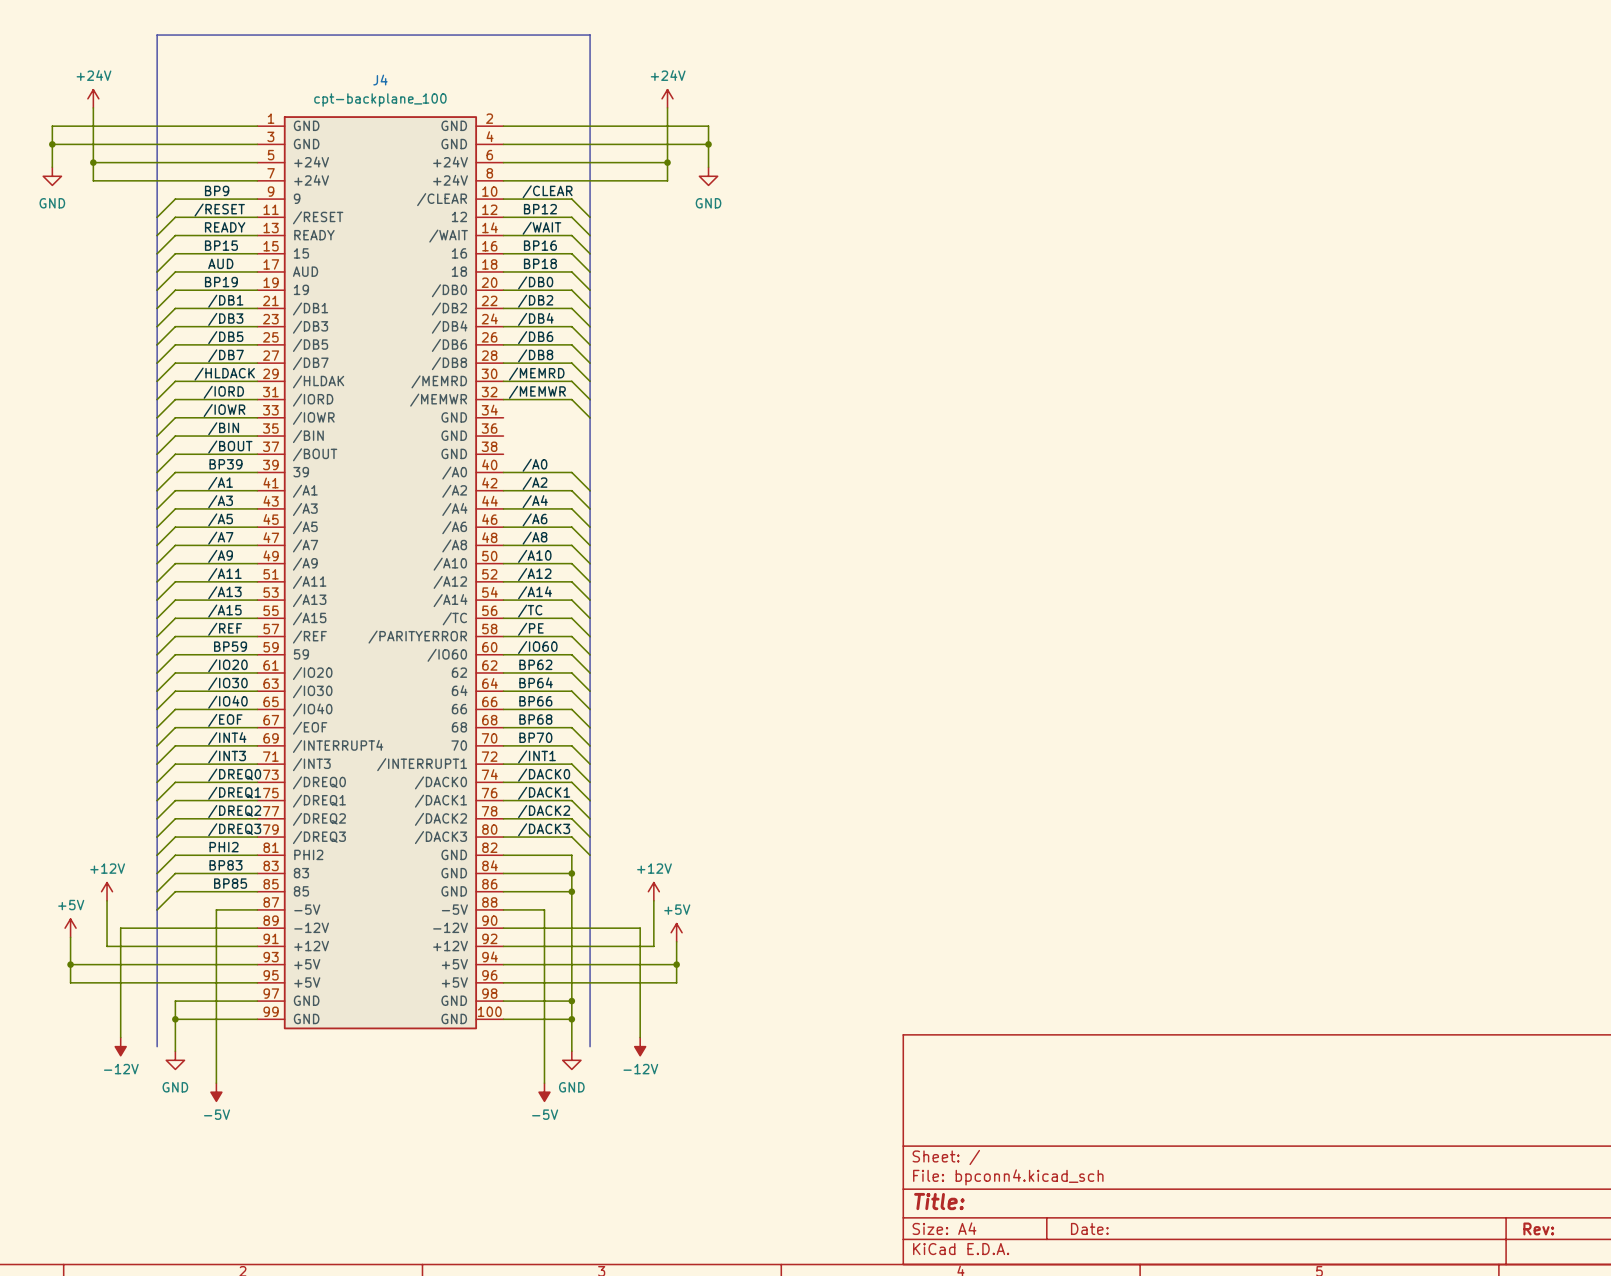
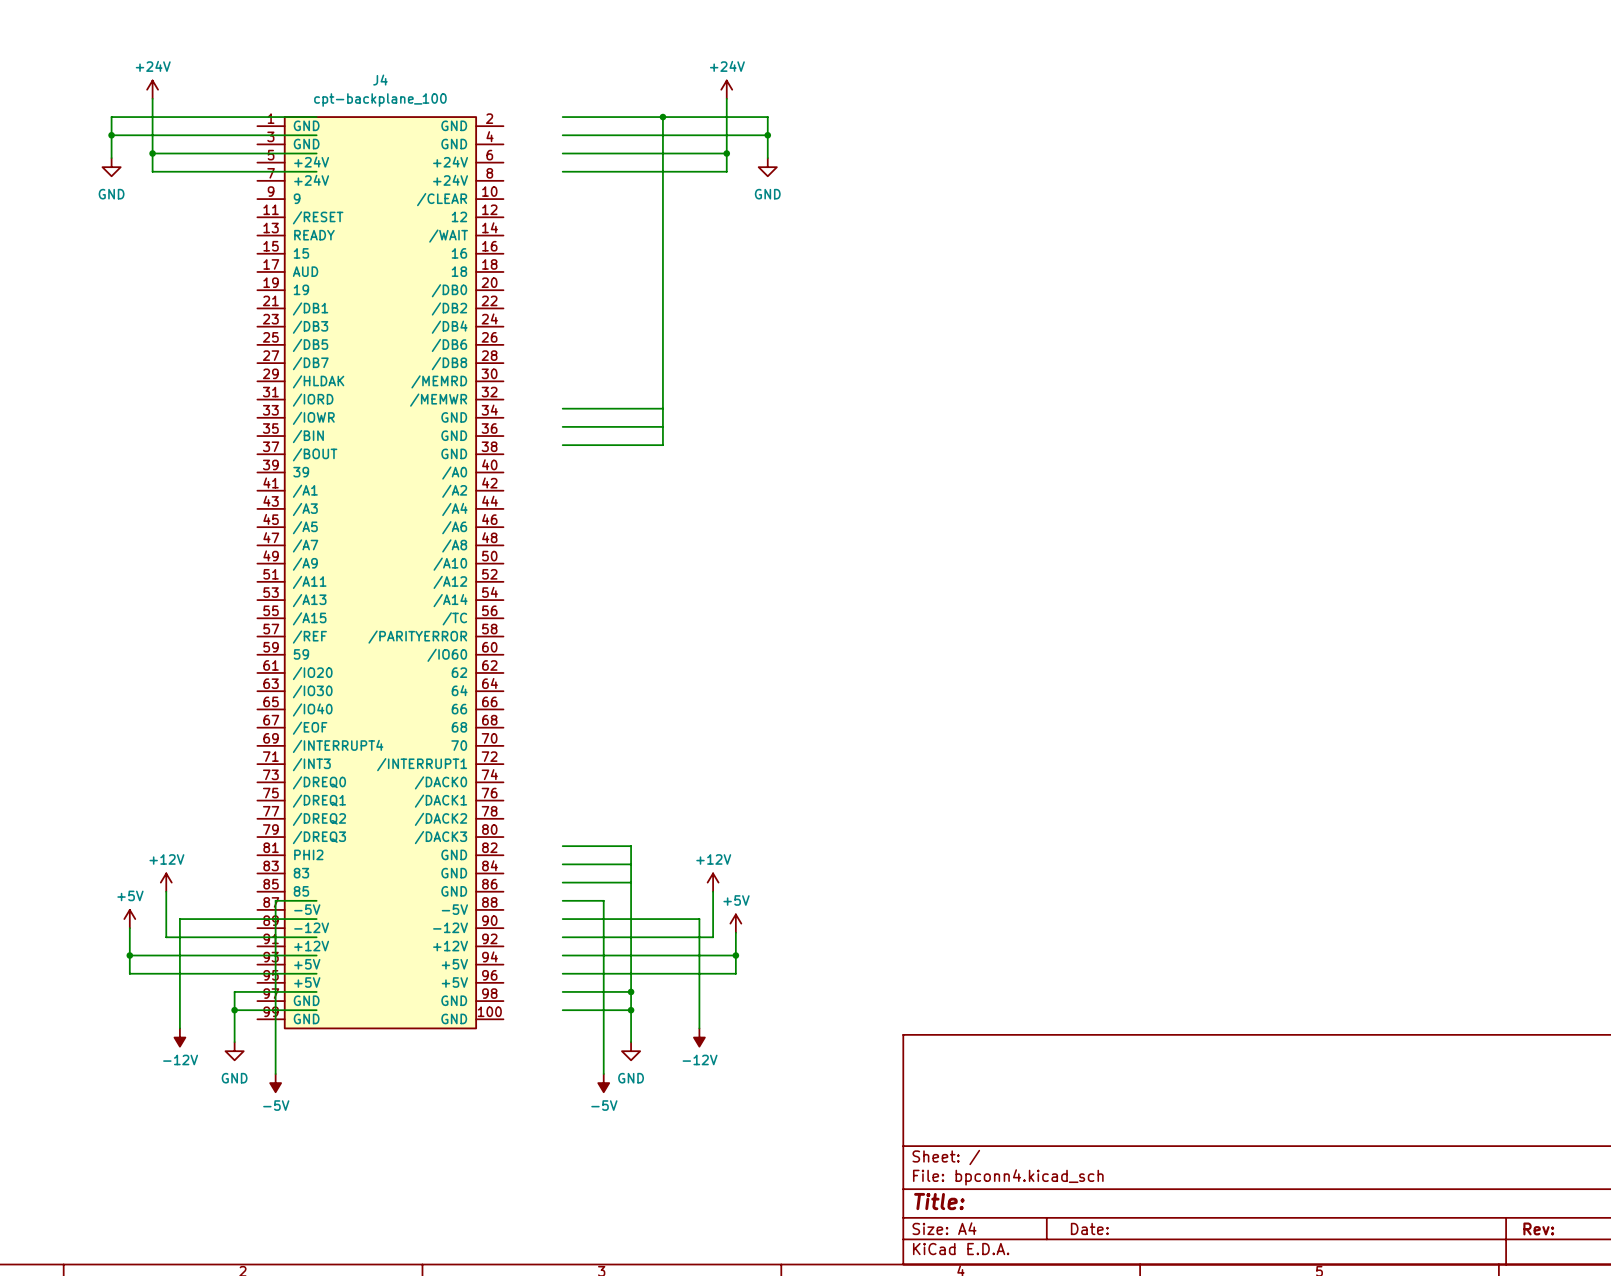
power symbol position: +24V (93, 98) -> +24V (152, 89)
power symbol position: +24V (667, 98) -> +24V (726, 89)
wire: (93, 107) (93, 180) (257, 180) -> (152, 98) (152, 171) (316, 171)
wire: (667, 107) (667, 180) (503, 180) -> (726, 98) (726, 171) (562, 171)
wire: none -> (662, 117) (662, 445) (562, 445)
junction: none -> (662, 117)
wire: (257, 126) (52, 126) (52, 167) -> (316, 117) (111, 117) (111, 158)
wire: (503, 126) (708, 126) (708, 167) -> (562, 117) (767, 117) (767, 158)
junction: none -> (111, 135)
junction: none -> (767, 135)
wire: (52, 144) (257, 144) -> (111, 135) (316, 135)
junction: (52, 144) -> none
wire: (503, 144) (708, 144) -> (562, 135) (767, 135)
junction position: (708, 144) -> (726, 153)
junction: none -> (152, 153)
wire: (93, 162) (257, 162) -> (152, 153) (316, 153)
junction: (93, 162) -> none
wire: (503, 162) (667, 162) -> (562, 153) (726, 153)
junction: (667, 162) -> none
power symbol position: GND (52, 176) -> GND (111, 167)
power symbol position: GND (708, 176) -> GND (767, 167)
label: BP9 (217, 190) -> none
label: /CLEAR (547, 191) -> none
wire: (175, 199) (257, 199) -> none
wire: (175, 199) (157, 217) -> none
wire: (503, 199) (571, 199) (590, 217) -> none
label: BP12 (540, 209) -> none
label: /RESET (219, 210) -> none
wire: (175, 217) (257, 217) -> none
wire: (175, 217) (157, 235) -> none
wire: (503, 217) (571, 217) (590, 235) -> none
label: READY (225, 227) -> none
label: /WAIT (541, 228) -> none
wire: (175, 235) (257, 235) -> none
wire: (175, 235) (157, 253) -> none
wire: (503, 235) (571, 235) (590, 253) -> none
label: BP15 (221, 245) -> none
label: BP16 (540, 245) -> none
wire: (175, 253) (257, 253) -> none
wire: (175, 253) (157, 271) -> none
wire: (503, 253) (571, 253) (590, 271) -> none
label: AUD (220, 263) -> none
label: BP18 (540, 263) -> none
wire: (175, 271) (257, 271) -> none
wire: (175, 271) (157, 290) -> none
wire: (503, 271) (571, 271) (590, 290) -> none
label: BP19 (221, 282) -> none
label: /DB0 (535, 282) -> none
wire: (175, 290) (257, 290) -> none
wire: (175, 290) (157, 308) -> none
wire: (503, 290) (571, 290) (590, 308) -> none
label: /DB1 (225, 301) -> none
label: /DB2 (535, 301) -> none
wire: (257, 308) (175, 308) (157, 326) -> none
wire: (503, 308) (571, 308) (590, 326) -> none
label: /DB3 (225, 319) -> none
label: /DB4 (535, 319) -> none
wire: (257, 326) (175, 326) (157, 344) -> none
wire: (503, 326) (571, 326) (590, 344) -> none
label: /DB5 (225, 337) -> none
label: /DB6 (535, 337) -> none
wire: (257, 344) (175, 344) (157, 363) -> none
wire: (503, 344) (571, 344) (590, 363) -> none
label: /DB7 (226, 355) -> none
label: /DB8 (535, 355) -> none
wire: (257, 363) (175, 363) (157, 381) -> none
wire: (503, 363) (571, 363) (590, 381) -> none
label: /HLDACK (224, 374) -> none
label: /MEMRD (536, 374) -> none
wire: (175, 381) (257, 381) -> none
wire: (175, 381) (157, 399) -> none
wire: (503, 381) (571, 381) (590, 399) -> none
label: /IORD (223, 392) -> none
label: /MEMWR (537, 392) -> none
wire: (175, 399) (257, 399) -> none
wire: (175, 399) (157, 417) -> none
wire: (503, 399) (571, 399) (590, 417) -> none
wire: none -> (562, 408) (662, 408)
label: /IOWR (224, 410) -> none
wire: (175, 417) (257, 417) -> none
wire: (175, 417) (157, 436) -> none
wire: none -> (562, 426) (662, 426)
label: /BIN (223, 428) -> none
wire: (175, 436) (257, 436) -> none
wire: (175, 436) (157, 454) -> none
label: /BOUT (230, 446) -> none
wire: (175, 454) (257, 454) -> none
wire: (175, 454) (157, 472) -> none
label: BP39 (226, 464) -> none
label: /A0 (535, 465) -> none
wire: (175, 472) (257, 472) -> none
wire: (175, 472) (157, 490) -> none
wire: (503, 472) (571, 472) (590, 490) -> none
label: /A1 (220, 483) -> none
label: /A2 (535, 483) -> none
wire: (257, 490) (175, 490) (157, 508) -> none
wire: (503, 490) (571, 490) (590, 508) -> none
label: /A3 (220, 501) -> none
label: /A4 (535, 501) -> none
wire: (257, 508) (175, 508) (157, 527) -> none
wire: (503, 508) (571, 508) (590, 527) -> none
label: /A5 (220, 519) -> none
label: /A6 (535, 519) -> none
wire: (257, 527) (175, 527) (157, 545) -> none
wire: (503, 527) (571, 527) (590, 545) -> none
label: /A7 (220, 538) -> none
label: /A8 (535, 538) -> none
wire: (257, 545) (175, 545) (157, 563) -> none
wire: (503, 545) (571, 545) (590, 563) -> none
label: /A9 (220, 556) -> none
label: /A10 (534, 556) -> none
wire: (257, 563) (175, 563) (157, 581) -> none
wire: (503, 563) (571, 563) (590, 581) -> none
label: /A11 (224, 574) -> none
label: /A12 (534, 574) -> none
wire: (257, 581) (175, 581) (157, 600) -> none
wire: (503, 581) (571, 581) (590, 600) -> none
label: /A13 (224, 592) -> none
label: /A14 (535, 592) -> none
wire: (257, 600) (175, 600) (157, 618) -> none
wire: (503, 600) (571, 600) (590, 618) -> none
label: /A15 (224, 611) -> none
label: /TC (530, 611) -> none
wire: (257, 618) (175, 618) (157, 636) -> none
wire: (503, 618) (571, 618) (590, 636) -> none
label: /REF (225, 629) -> none
label: /PE (530, 629) -> none
wire: (257, 636) (175, 636) (157, 654) -> none
wire: (503, 636) (571, 636) (590, 654) -> none
label: BP59 (230, 646) -> none
label: /IO60 (537, 647) -> none
wire: (175, 654) (257, 654) -> none
wire: (175, 654) (157, 672) -> none
wire: (503, 654) (571, 654) (590, 672) -> none
label: BP62 (535, 664) -> none
label: /IO20 (227, 665) -> none
wire: (175, 672) (257, 672) -> none
wire: (175, 672) (157, 691) -> none
wire: (503, 672) (571, 672) (590, 691) -> none
label: BP64 (536, 682) -> none
label: /IO30 (227, 683) -> none
wire: (175, 691) (257, 691) -> none
wire: (175, 691) (157, 709) -> none
wire: (503, 691) (571, 691) (590, 709) -> none
label: BP66 (535, 701) -> none
label: /IO40 (227, 702) -> none
wire: (175, 709) (257, 709) -> none
wire: (175, 709) (157, 727) -> none
wire: (503, 709) (571, 709) (590, 727) -> none
label: BP68 (535, 719) -> none
label: /EOF (225, 720) -> none
wire: (175, 727) (257, 727) -> none
wire: (175, 727) (157, 745) -> none
wire: (503, 727) (571, 727) (590, 745) -> none
label: BP70 (535, 737) -> none
label: /INT4 (227, 738) -> none
wire: (175, 745) (257, 745) -> none
wire: (175, 745) (157, 764) -> none
wire: (503, 745) (571, 745) (590, 764) -> none
label: /INT3 (227, 756) -> none
label: /INT1 (536, 756) -> none
wire: (257, 764) (175, 764) (157, 782) -> none
wire: (503, 764) (571, 764) (590, 782) -> none
label: /DREQ0 (234, 775) -> none
label: /DACK0 (544, 775) -> none
wire: (175, 782) (257, 782) -> none
wire: (175, 782) (157, 800) -> none
wire: (503, 782) (571, 782) (590, 800) -> none
label: /DREQ1 (234, 793) -> none
label: /DACK1 (544, 793) -> none
wire: (175, 800) (257, 800) -> none
wire: (175, 800) (157, 818) -> none
wire: (503, 800) (571, 800) (590, 818) -> none
label: /DREQ2 (234, 811) -> none
label: /DACK2 (544, 811) -> none
wire: (175, 818) (257, 818) -> none
wire: (175, 818) (157, 837) -> none
wire: (503, 818) (571, 818) (590, 837) -> none
label: /DREQ3 (234, 829) -> none
label: /DACK3 (544, 829) -> none
wire: (175, 837) (257, 837) -> none
wire: (175, 837) (157, 855) -> none
wire: (503, 837) (571, 837) (590, 855) -> none
label: PHI2 (224, 847) -> none
wire: (175, 855) (257, 855) -> none
wire: (175, 855) (157, 873) -> none
wire: (503, 855) (571, 855) (571, 1051) -> (562, 846) (631, 846) (631, 1042)
label: BP83 (226, 865) -> none
wire: (175, 873) (257, 873) -> none
wire: (175, 873) (157, 891) -> none
wire: (503, 873) (571, 873) -> (562, 864) (631, 864)
junction: (571, 873) -> none
label: BP85 (230, 883) -> none
power symbol position: +12V (107, 891) -> +12V (166, 882)
wire: (175, 891) (257, 891) -> none
wire: (175, 891) (157, 909) -> none
wire: (503, 891) (571, 891) -> (562, 882) (631, 882)
junction: (571, 891) -> none
power symbol position: +12V (653, 891) -> +12V (713, 882)
wire: (107, 900) (107, 946) (257, 946) -> (166, 891) (166, 937) (316, 937)
wire: (653, 900) (653, 946) (503, 946) -> (713, 891) (713, 937) (562, 937)
wire: (257, 909) (216, 909) (216, 1083) -> (316, 900) (275, 900) (275, 1073)
wire: (503, 909) (544, 909) (544, 1083) -> (562, 900) (603, 900) (603, 1073)
power symbol position: +5V (70, 928) -> +5V (129, 919)
wire: (257, 928) (120, 928) (120, 1037) -> (316, 919) (179, 919) (179, 1028)
wire: (503, 928) (640, 928) (640, 1037) -> (562, 919) (699, 919) (699, 1028)
power symbol position: +5V (676, 932) -> +5V (735, 923)
wire: (70, 937) (70, 982) (257, 982) -> (129, 928) (129, 973) (316, 973)
wire: (676, 941) (676, 982) (503, 982) -> (735, 932) (735, 973) (562, 973)
junction: none -> (129, 955)
junction: none -> (735, 955)
wire: (70, 964) (257, 964) -> (129, 955) (316, 955)
junction: (70, 964) -> none
wire: (503, 964) (676, 964) -> (562, 955) (735, 955)
junction: (676, 964) -> none
junction: none -> (631, 991)
wire: (257, 1001) (175, 1001) (175, 1051) -> (316, 991) (234, 991) (234, 1042)
wire: (503, 1001) (571, 1001) -> (562, 991) (631, 991)
junction: (571, 1001) -> none
junction: none -> (234, 1010)
junction: none -> (631, 1010)
wire: (175, 1019) (257, 1019) -> (234, 1010) (316, 1010)
junction: (175, 1019) -> none
wire: (503, 1019) (571, 1019) -> (562, 1010) (631, 1010)
junction: (571, 1019) -> none
power symbol position: -12V (120, 1046) -> -12V (179, 1037)
bus: (157, 1046) (157, 35) (590, 35) (590, 1046) -> none
power symbol position: -12V (640, 1046) -> -12V (699, 1037)
power symbol position: GND (175, 1060) -> GND (234, 1051)
power symbol position: GND (571, 1060) -> GND (631, 1051)
power symbol position: -5V (216, 1092) -> -5V (275, 1083)
power symbol position: -5V (544, 1092) -> -5V (603, 1083)

